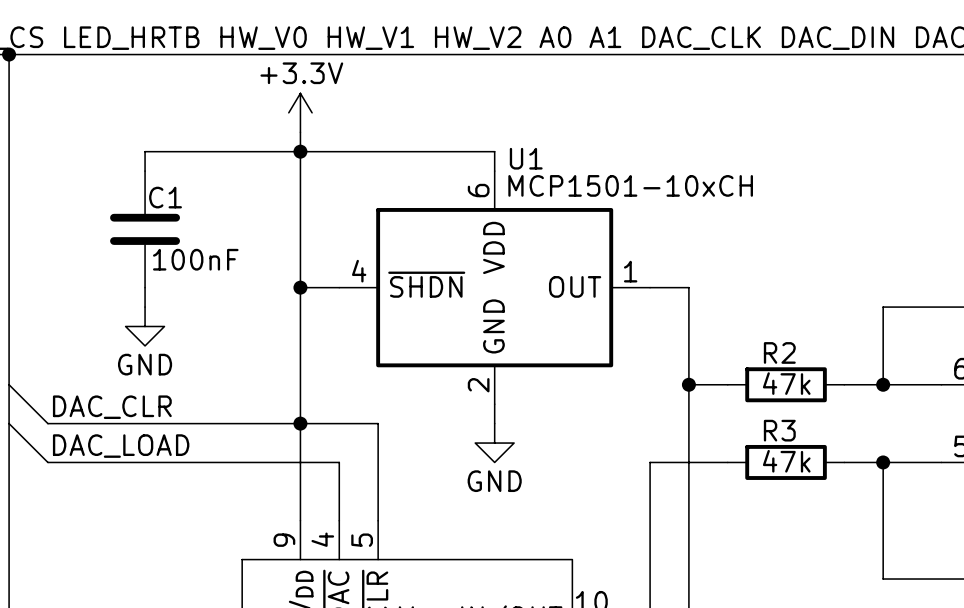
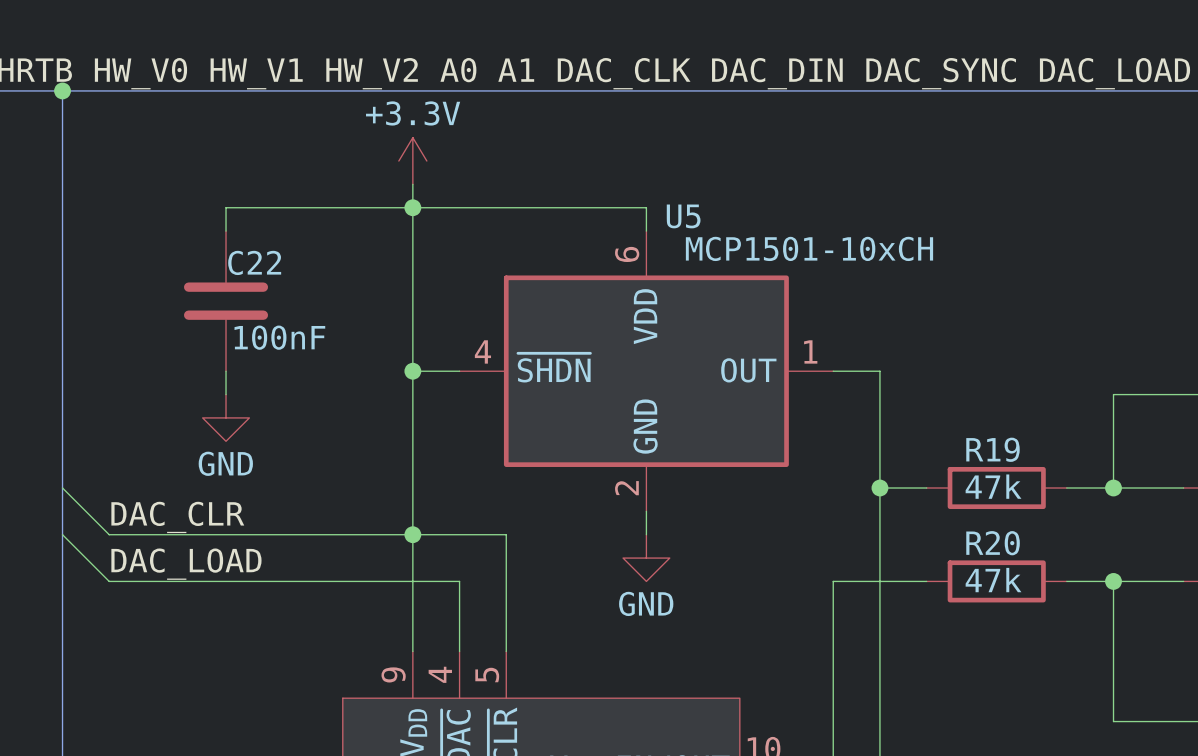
U1 name: U1 (526, 158) -> U5 (683, 216)
C1 name: C1 (165, 197) -> C22 (254, 262)
R2 name: R2 (779, 352) -> R19 (993, 449)
R3 name: R3 (779, 430) -> R20 (993, 543)

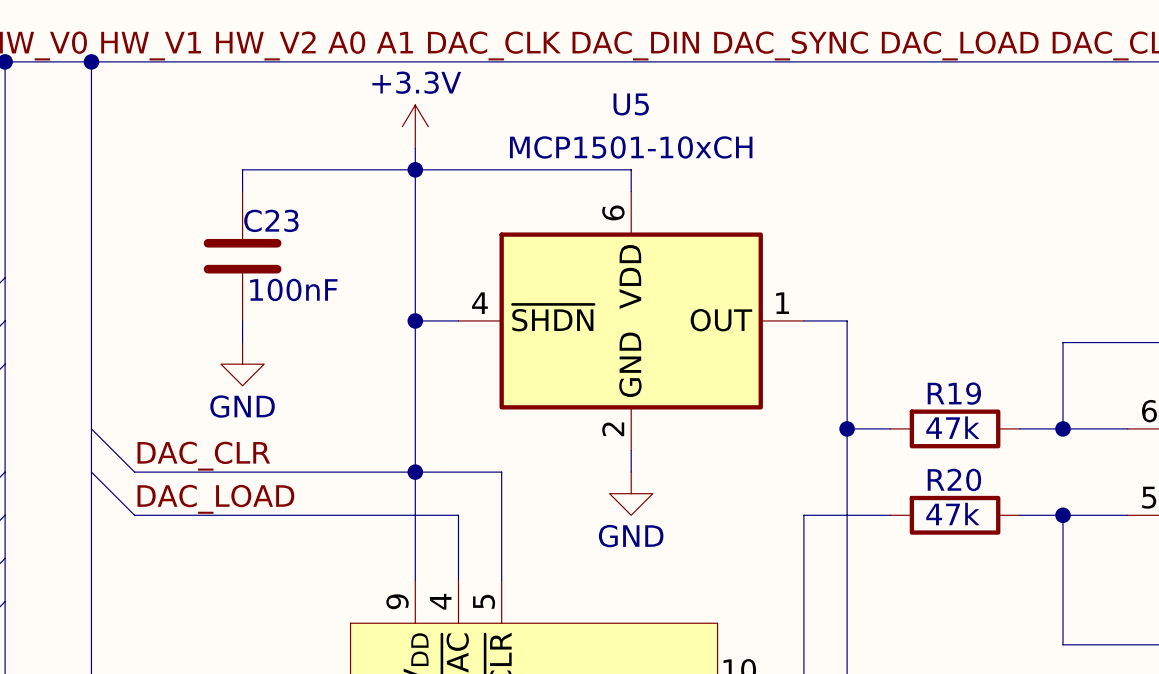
U5 name position: U5 (683, 216) -> U5 (631, 104)
U5 value position: MCP1501-10xCH (809, 248) -> MCP1501-10xCH (631, 147)
C22 name: C22 (254, 262) -> C23 (271, 220)

